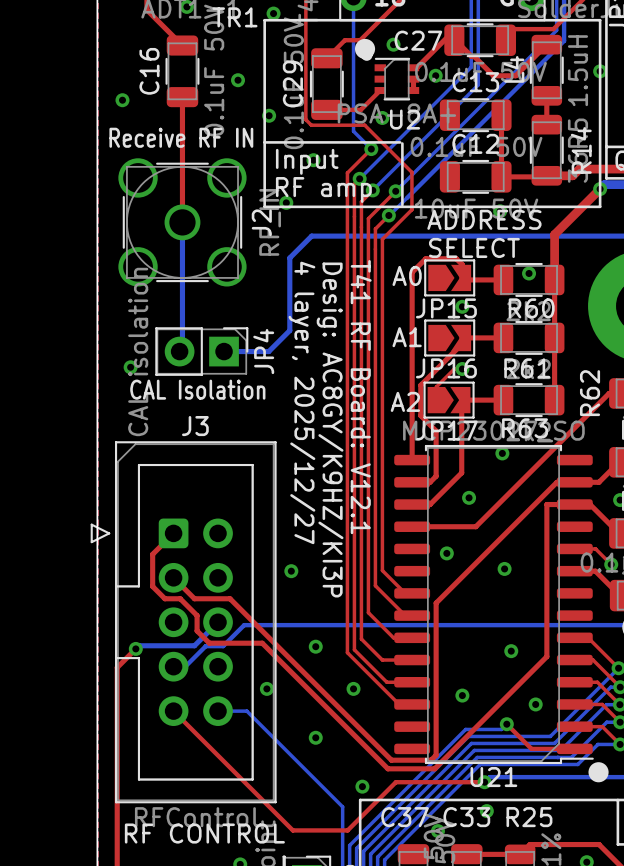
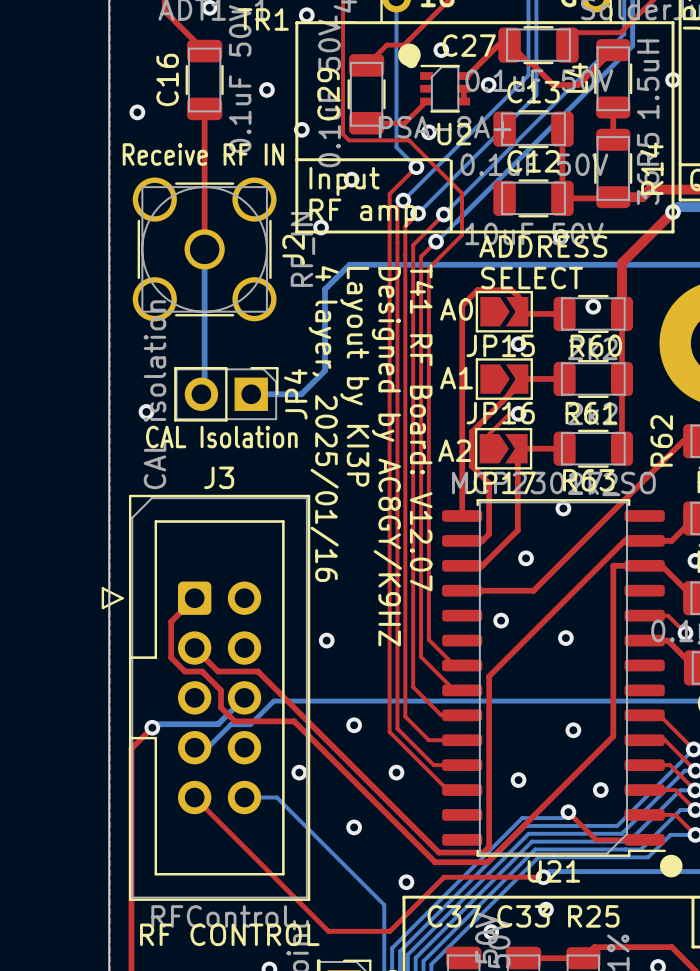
text: none -> Layout by KI3P (354, 376)
text: T41 RF Board: V12.1 (361, 397) -> T41 RF Board: V12.07 (421, 427)
text: 4 layer, 2025/12/27 (301, 402) -> 4 layer, 2025/01/16 (323, 424)
text: Desig: AC8GY/K9HZ/KI3P (330, 430) -> Designed by AC8GY/K9HZ (386, 456)

